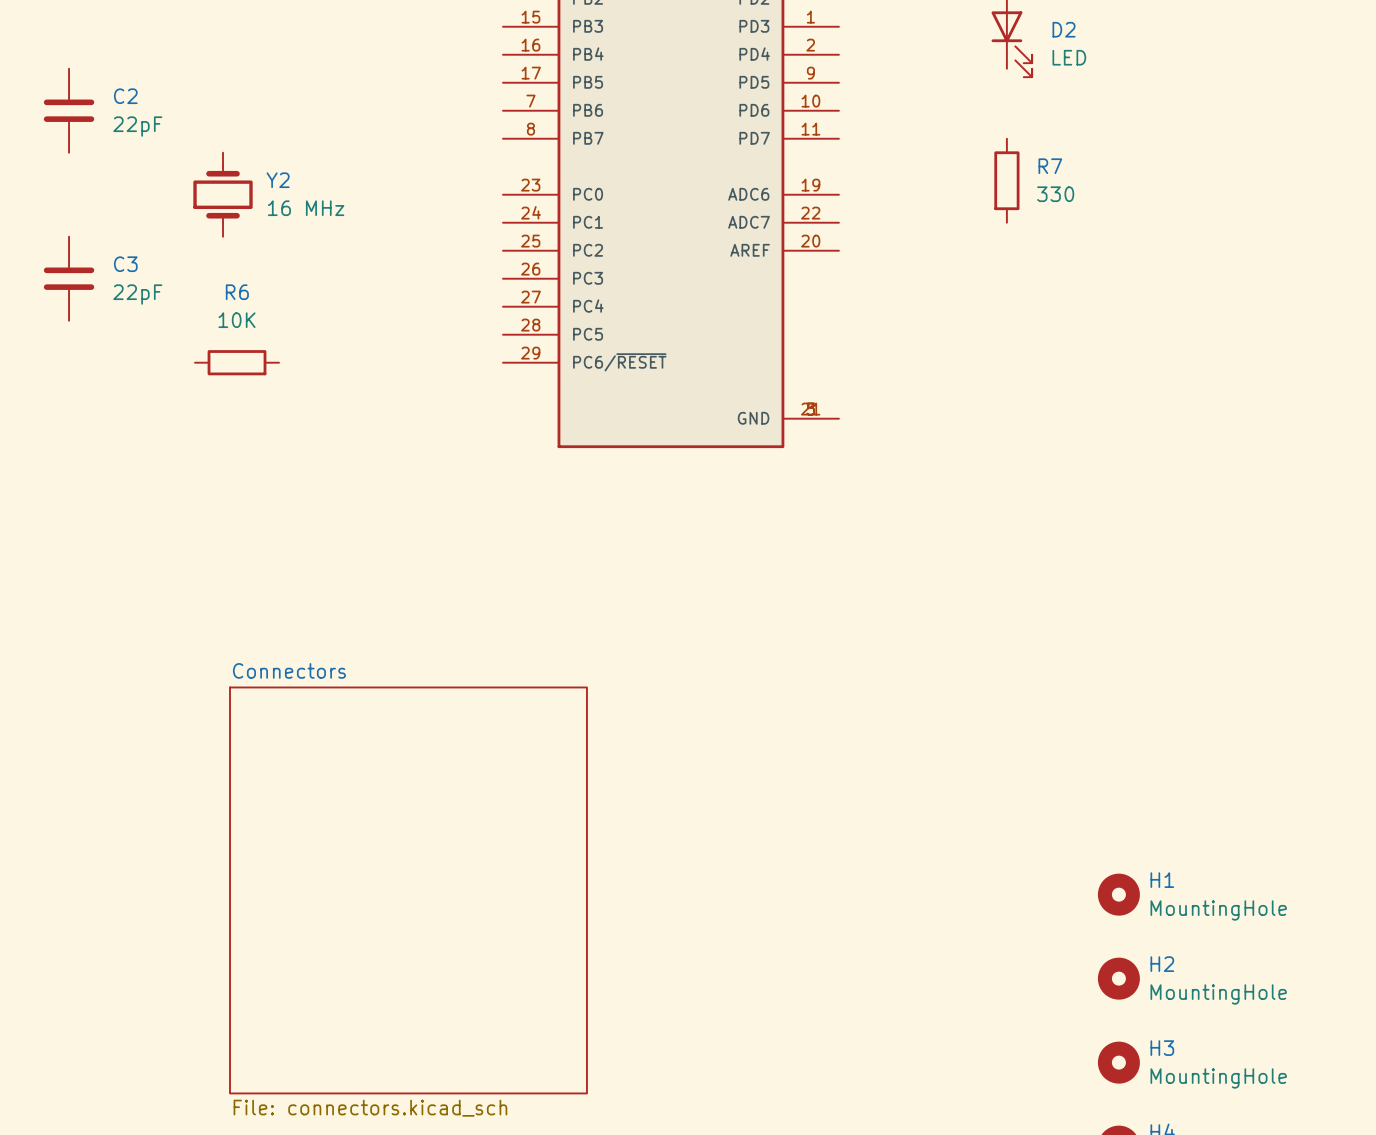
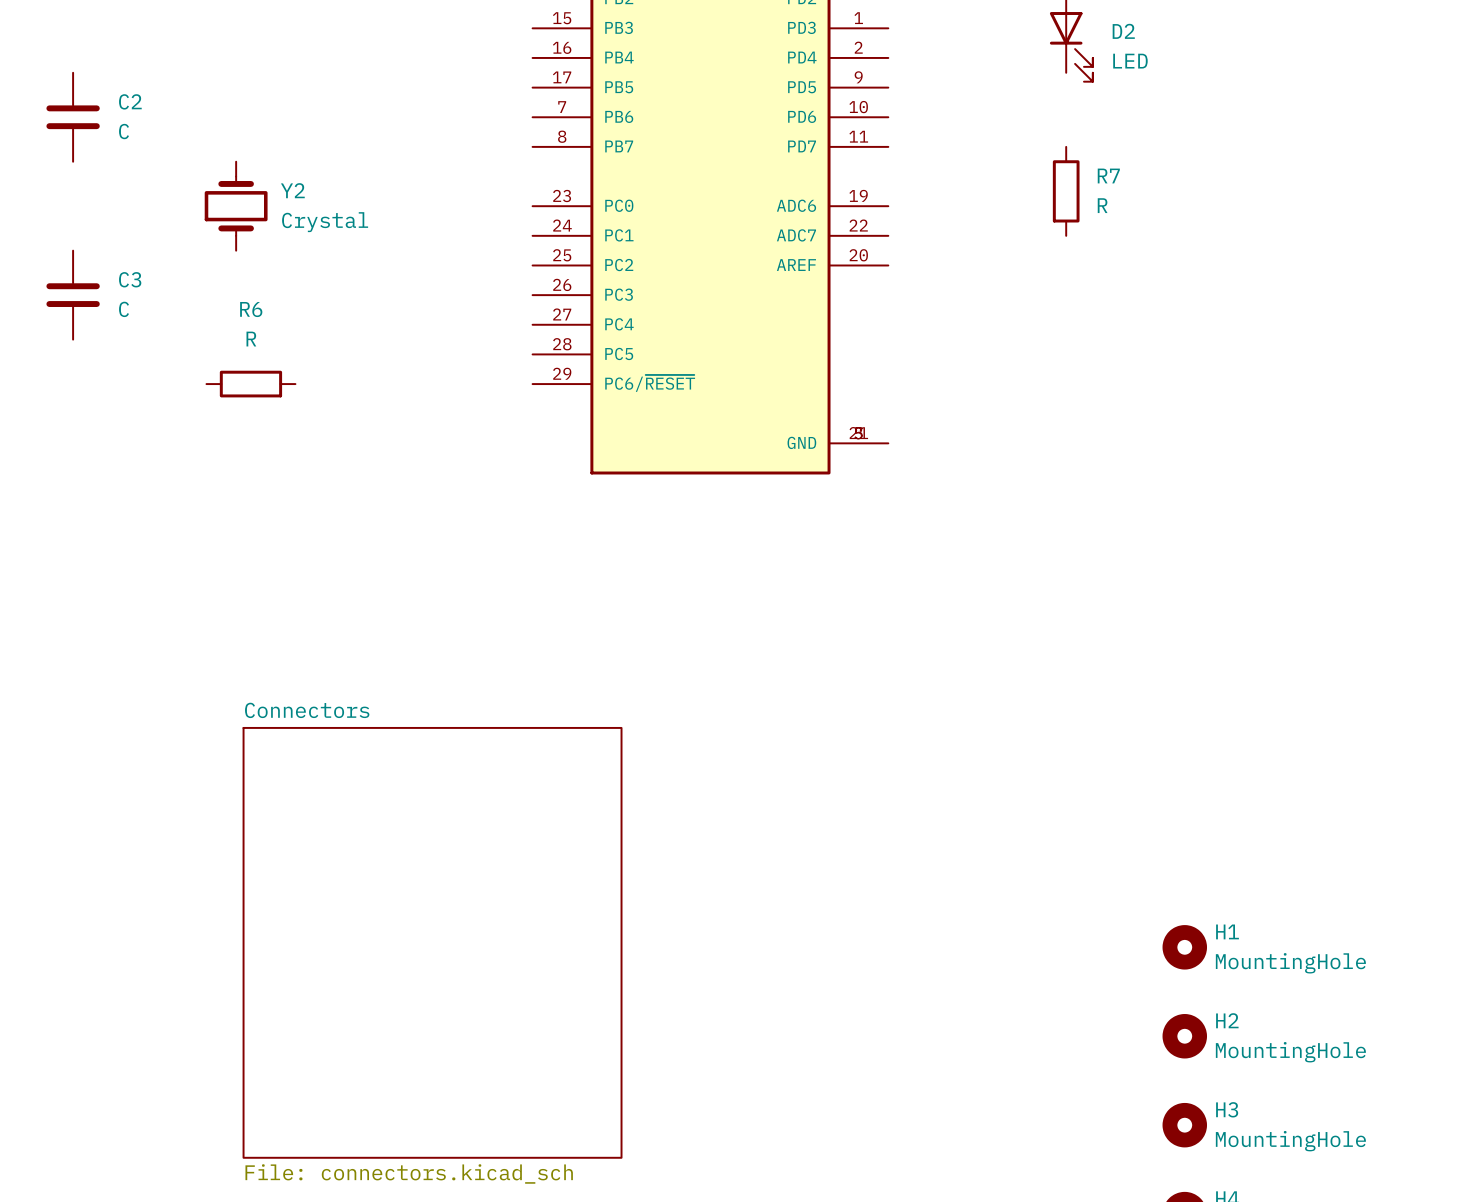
C2 value: 22pF (137, 126) -> C (124, 131)
R7 value: 330 (1055, 194) -> R (1102, 205)
Y2 value: 16 MHz (306, 208) -> Crystal (325, 222)
C3 value: 22pF (137, 294) -> C (124, 309)
R6 value: 10K (237, 320) -> R (251, 339)

